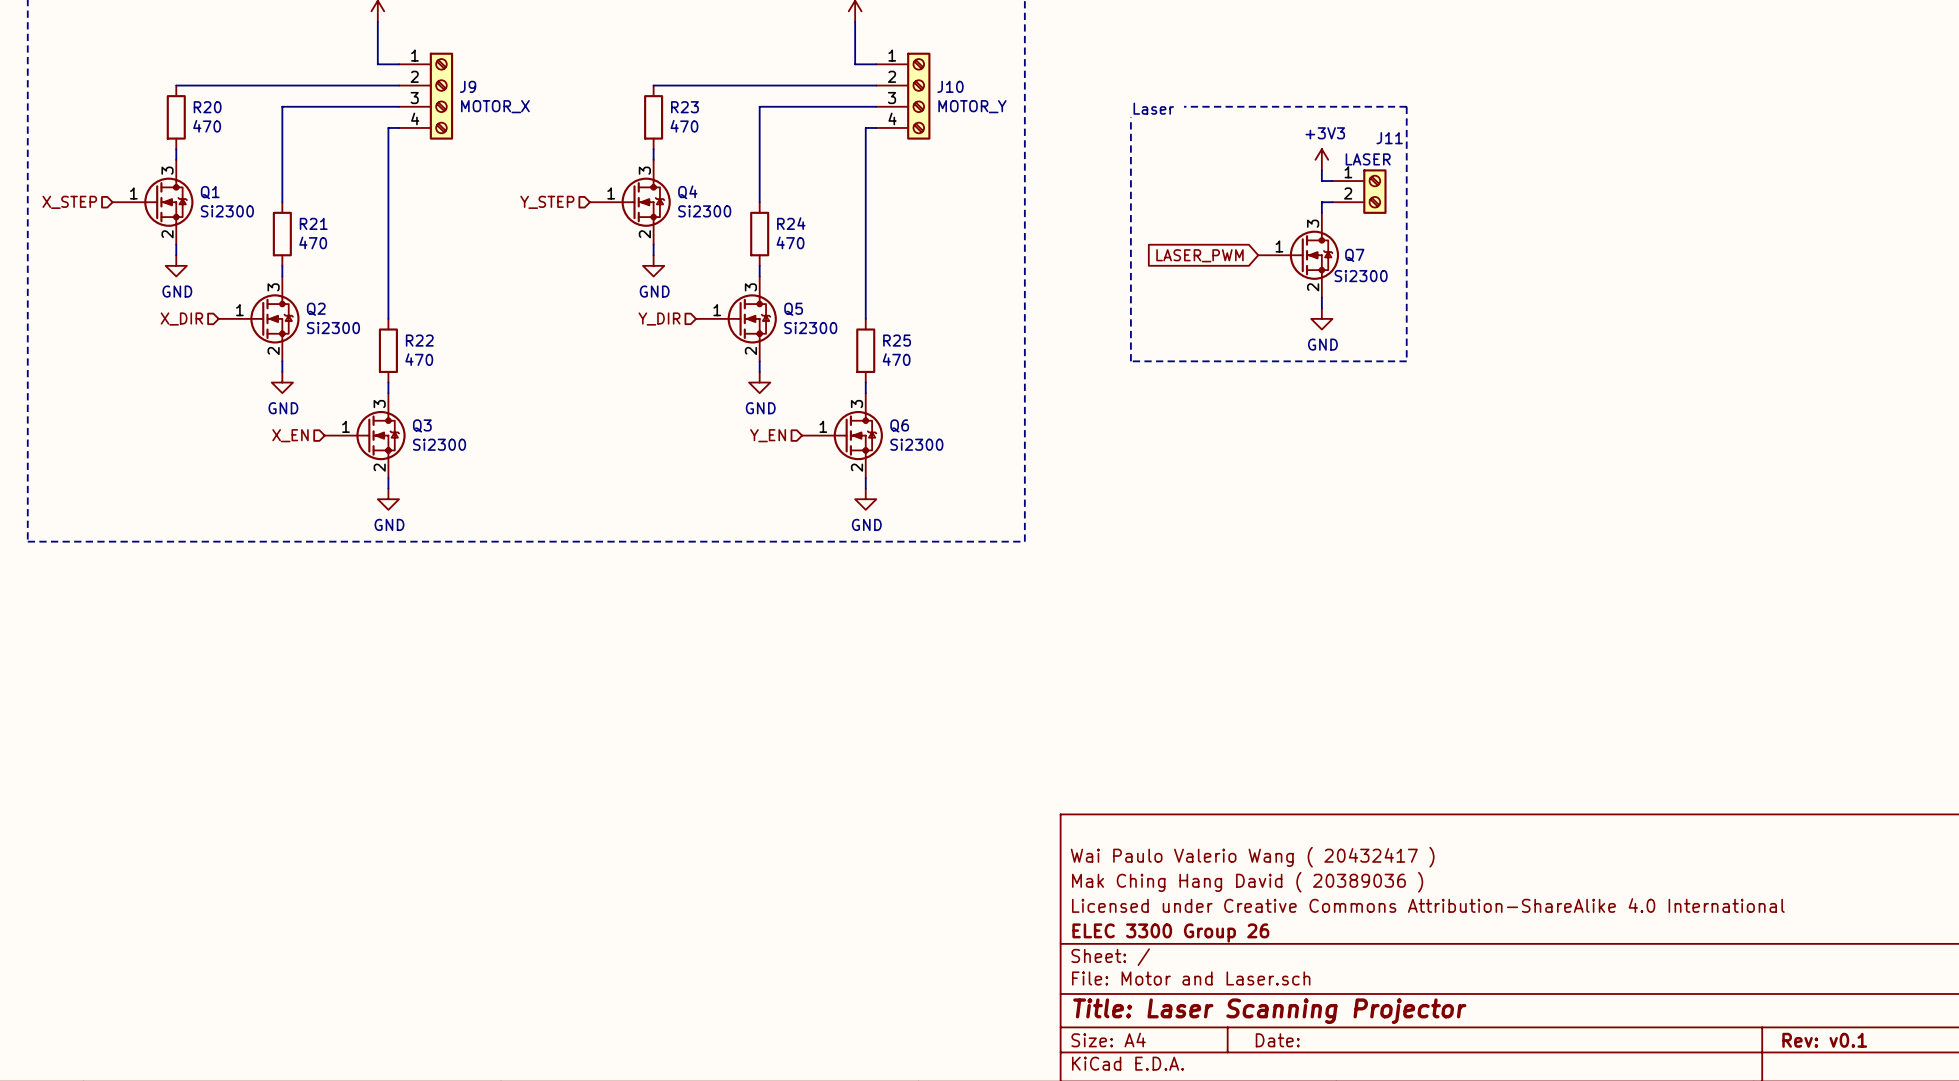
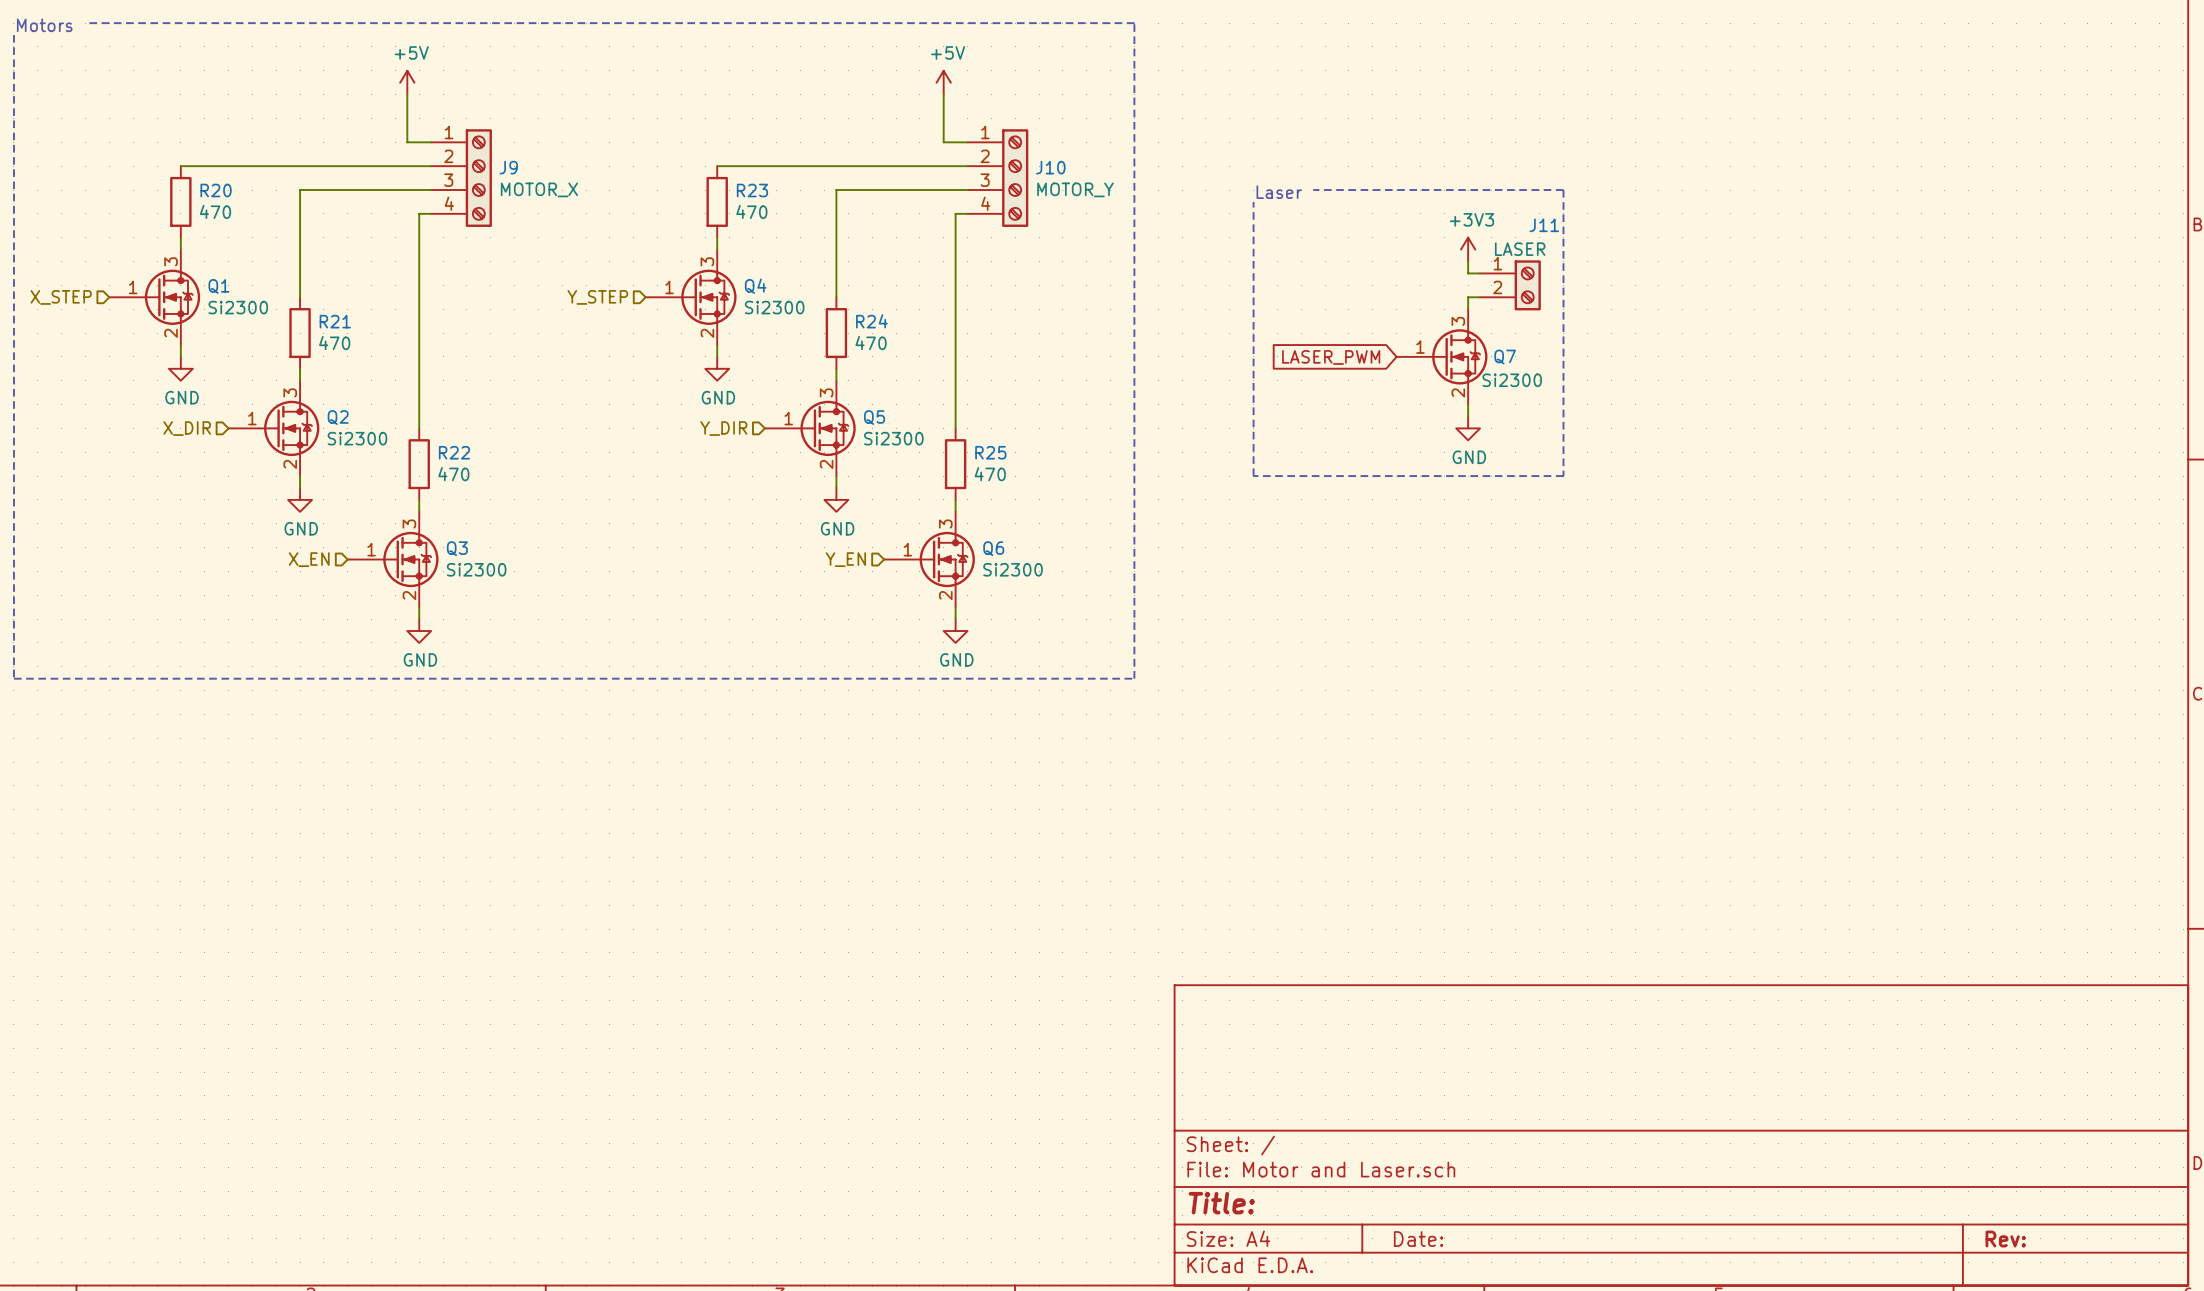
title block: Wai Paulo Valerio Wang ( 20432417 ) (1252, 857) -> none
title block: Mak Ching Hang David ( 20389036 ) (1247, 882) -> none
title block: Licensed under Creative Commons Attribution-ShareAlike 4.0 International (1428, 905) -> none
title block: ELEC 3300 Group 26 (1170, 932) -> none
title block: Title: Laser Scanning Projector (1269, 1011) -> Title: (1221, 1203)
title block: Rev: v0.1 (1824, 1040) -> Rev: (2005, 1239)

